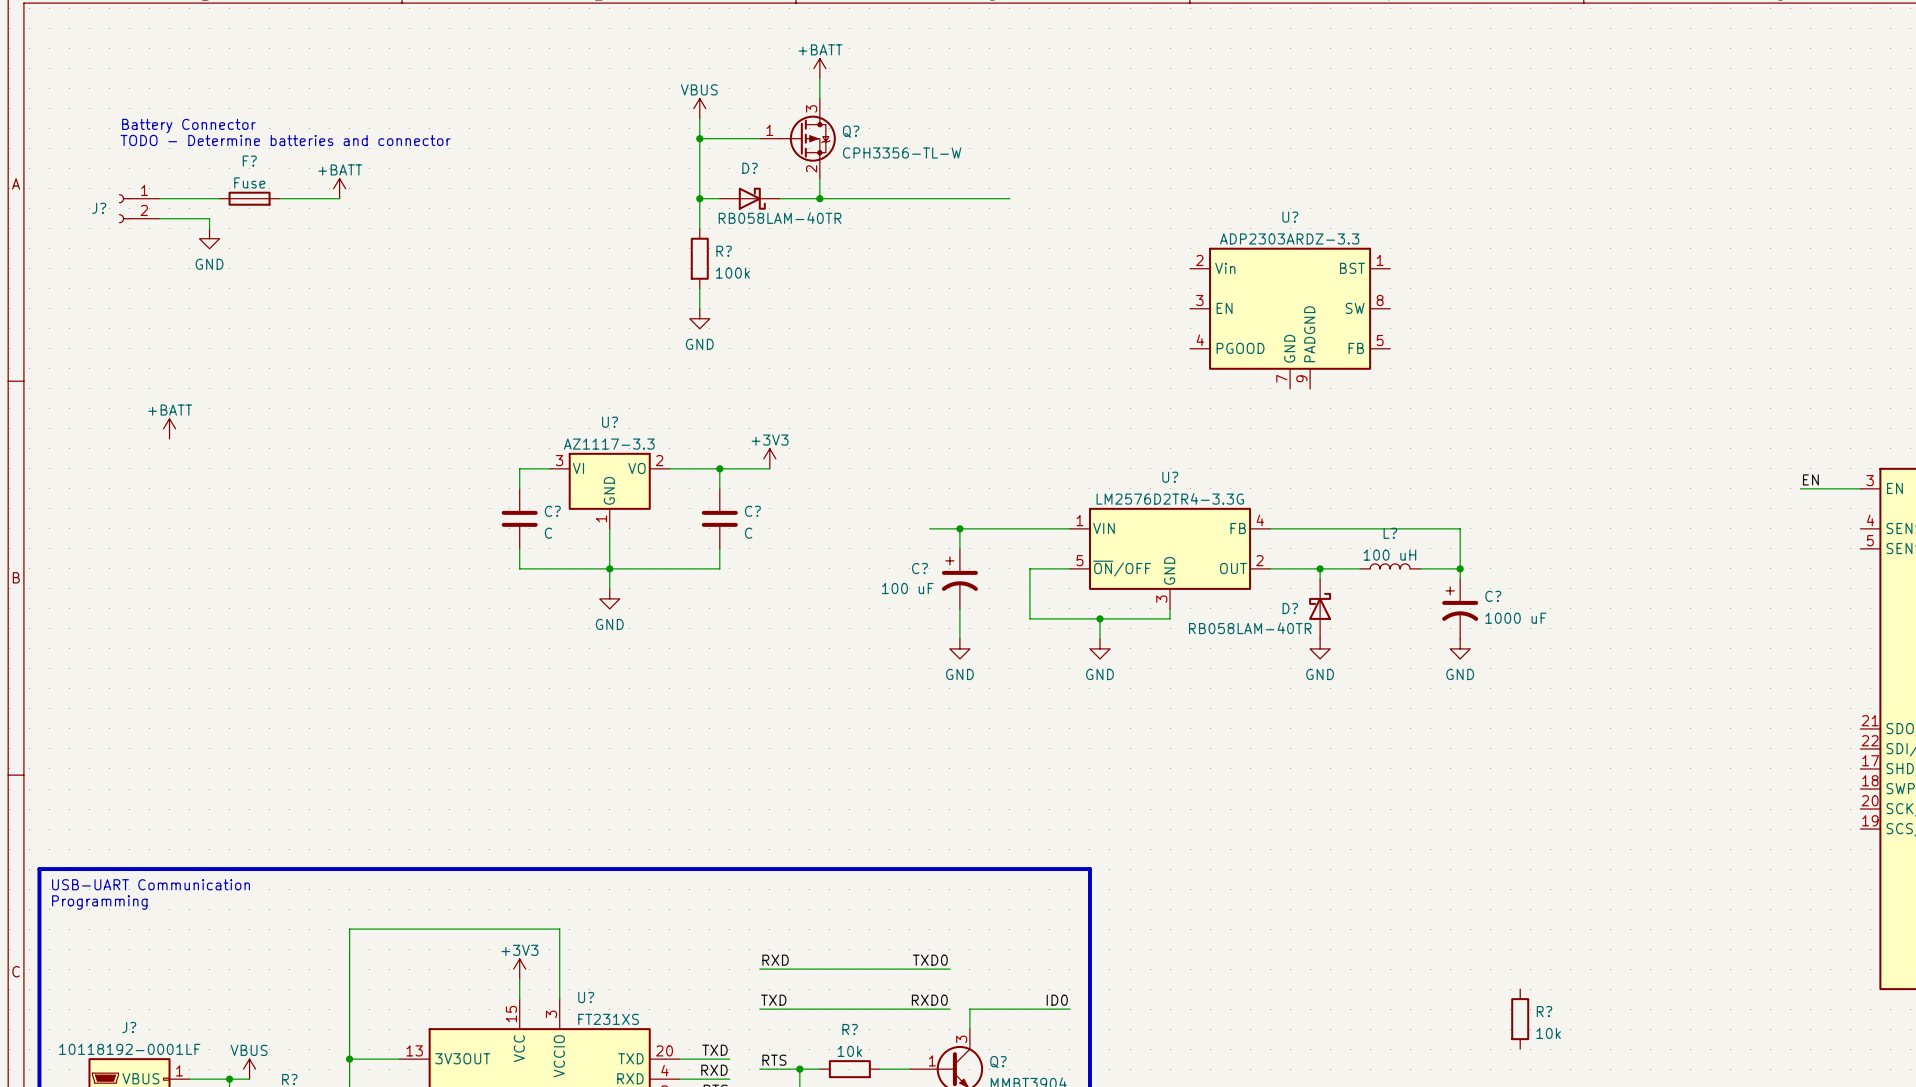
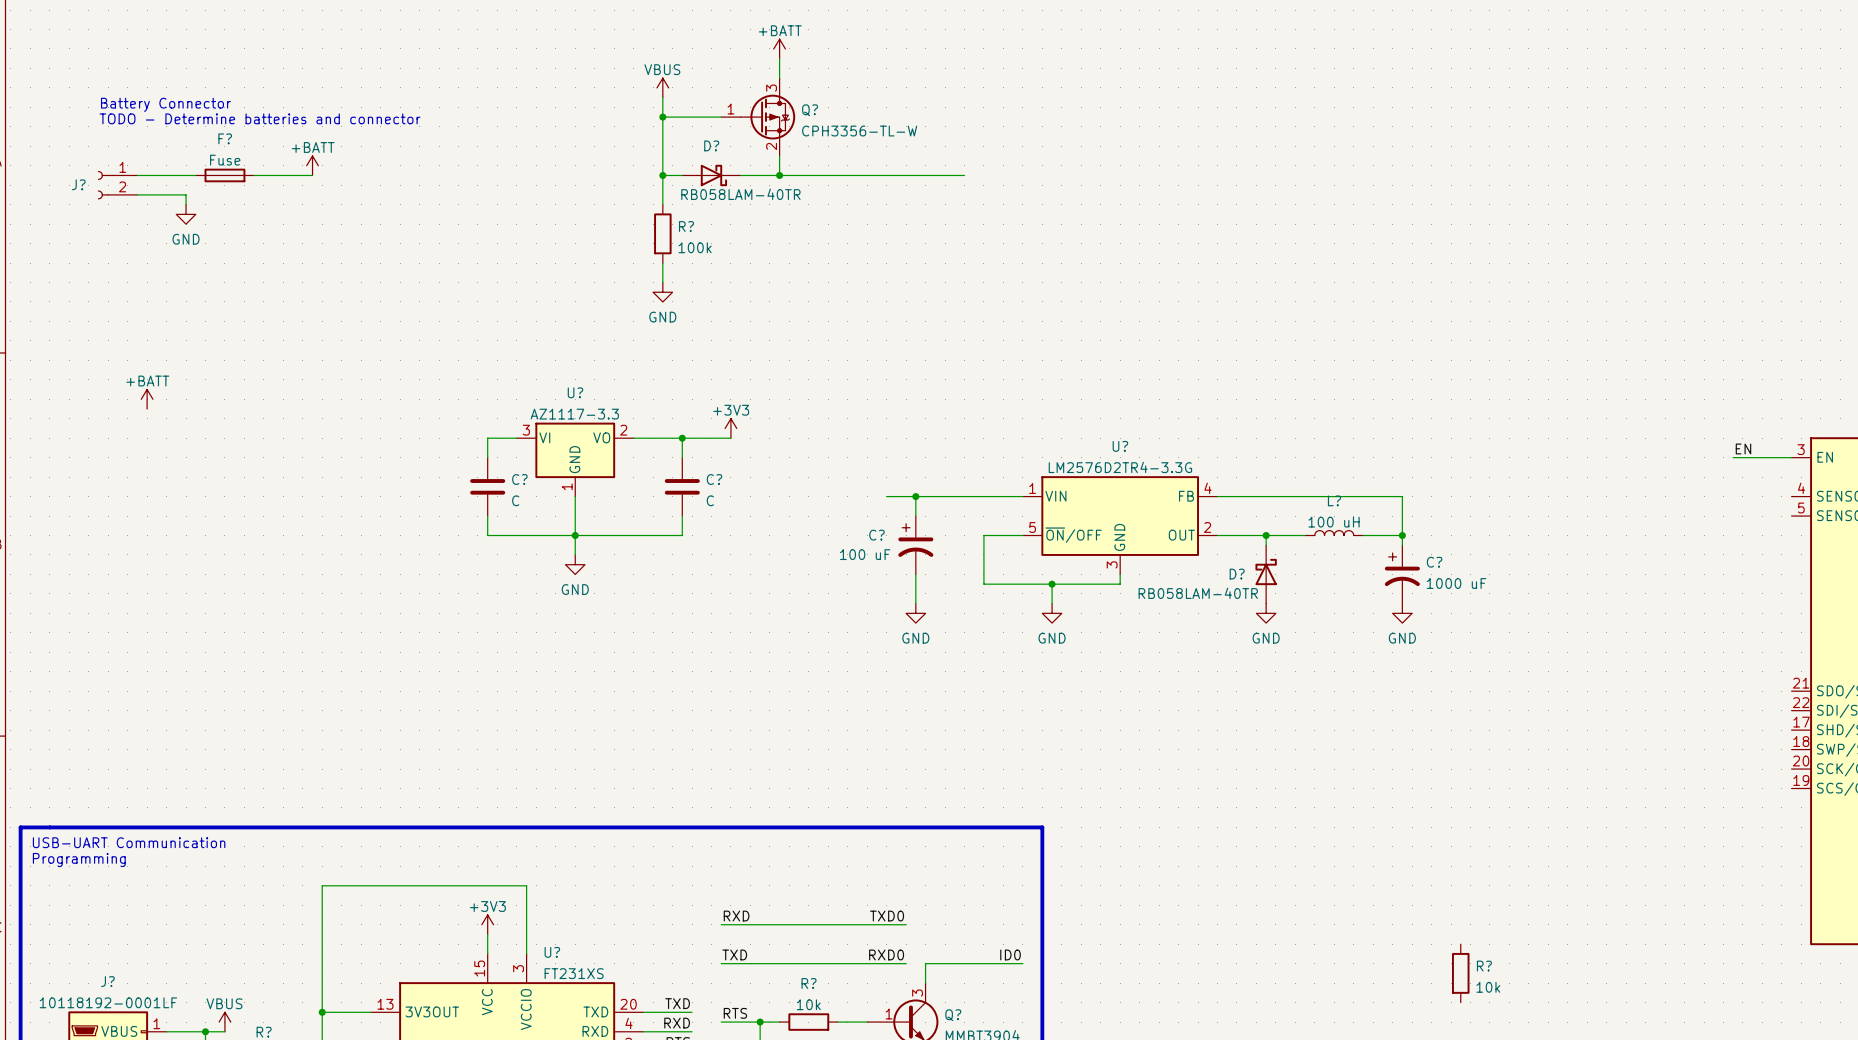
U?: ADP2303ARDZ-3.3 (1290, 318) -> none

